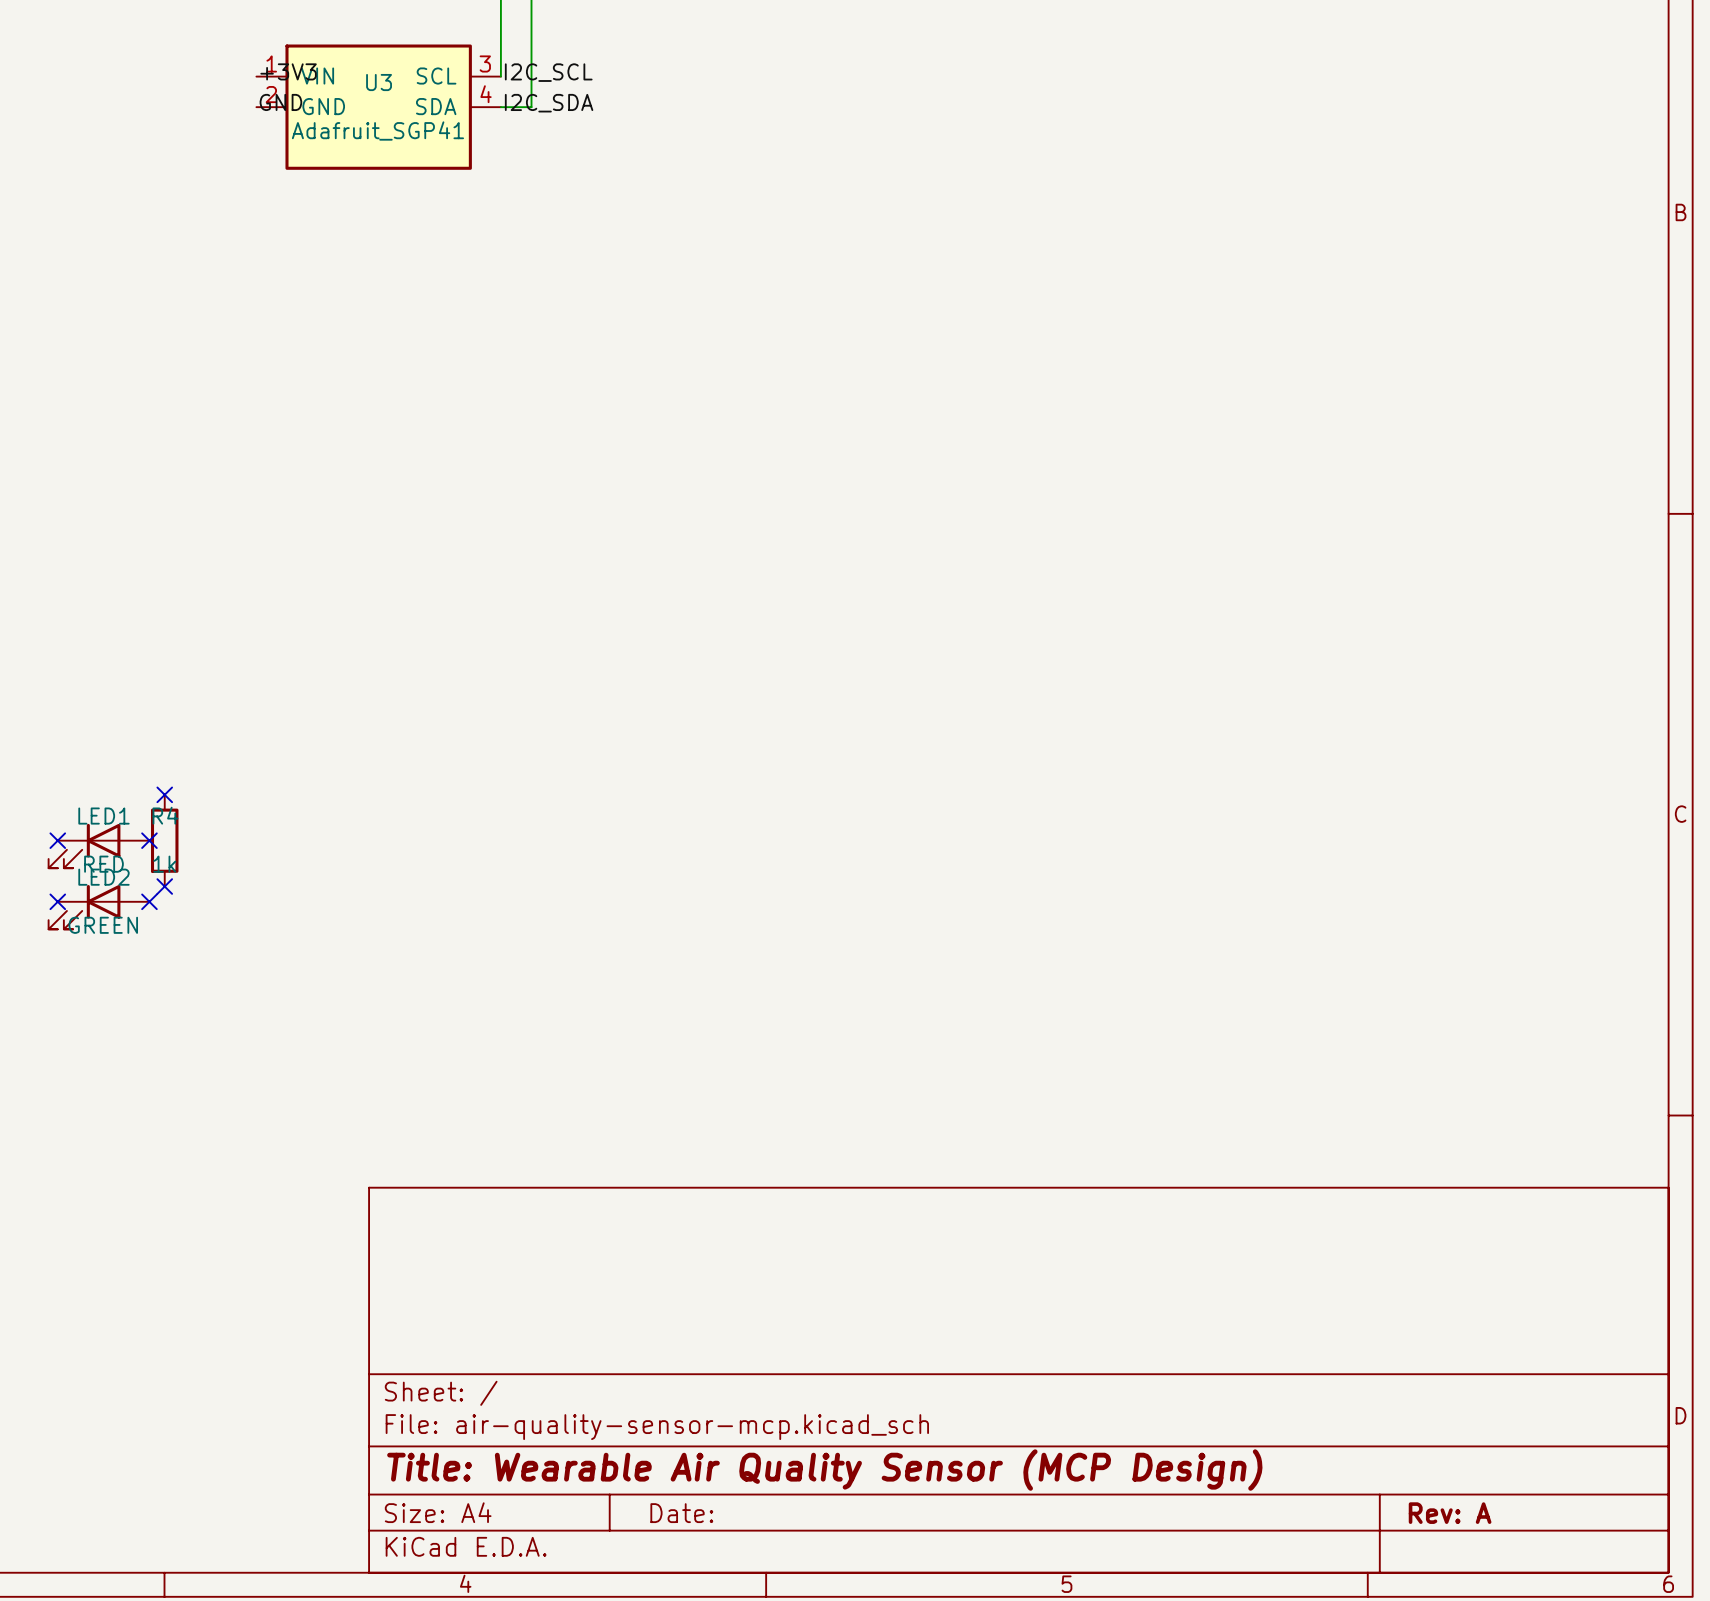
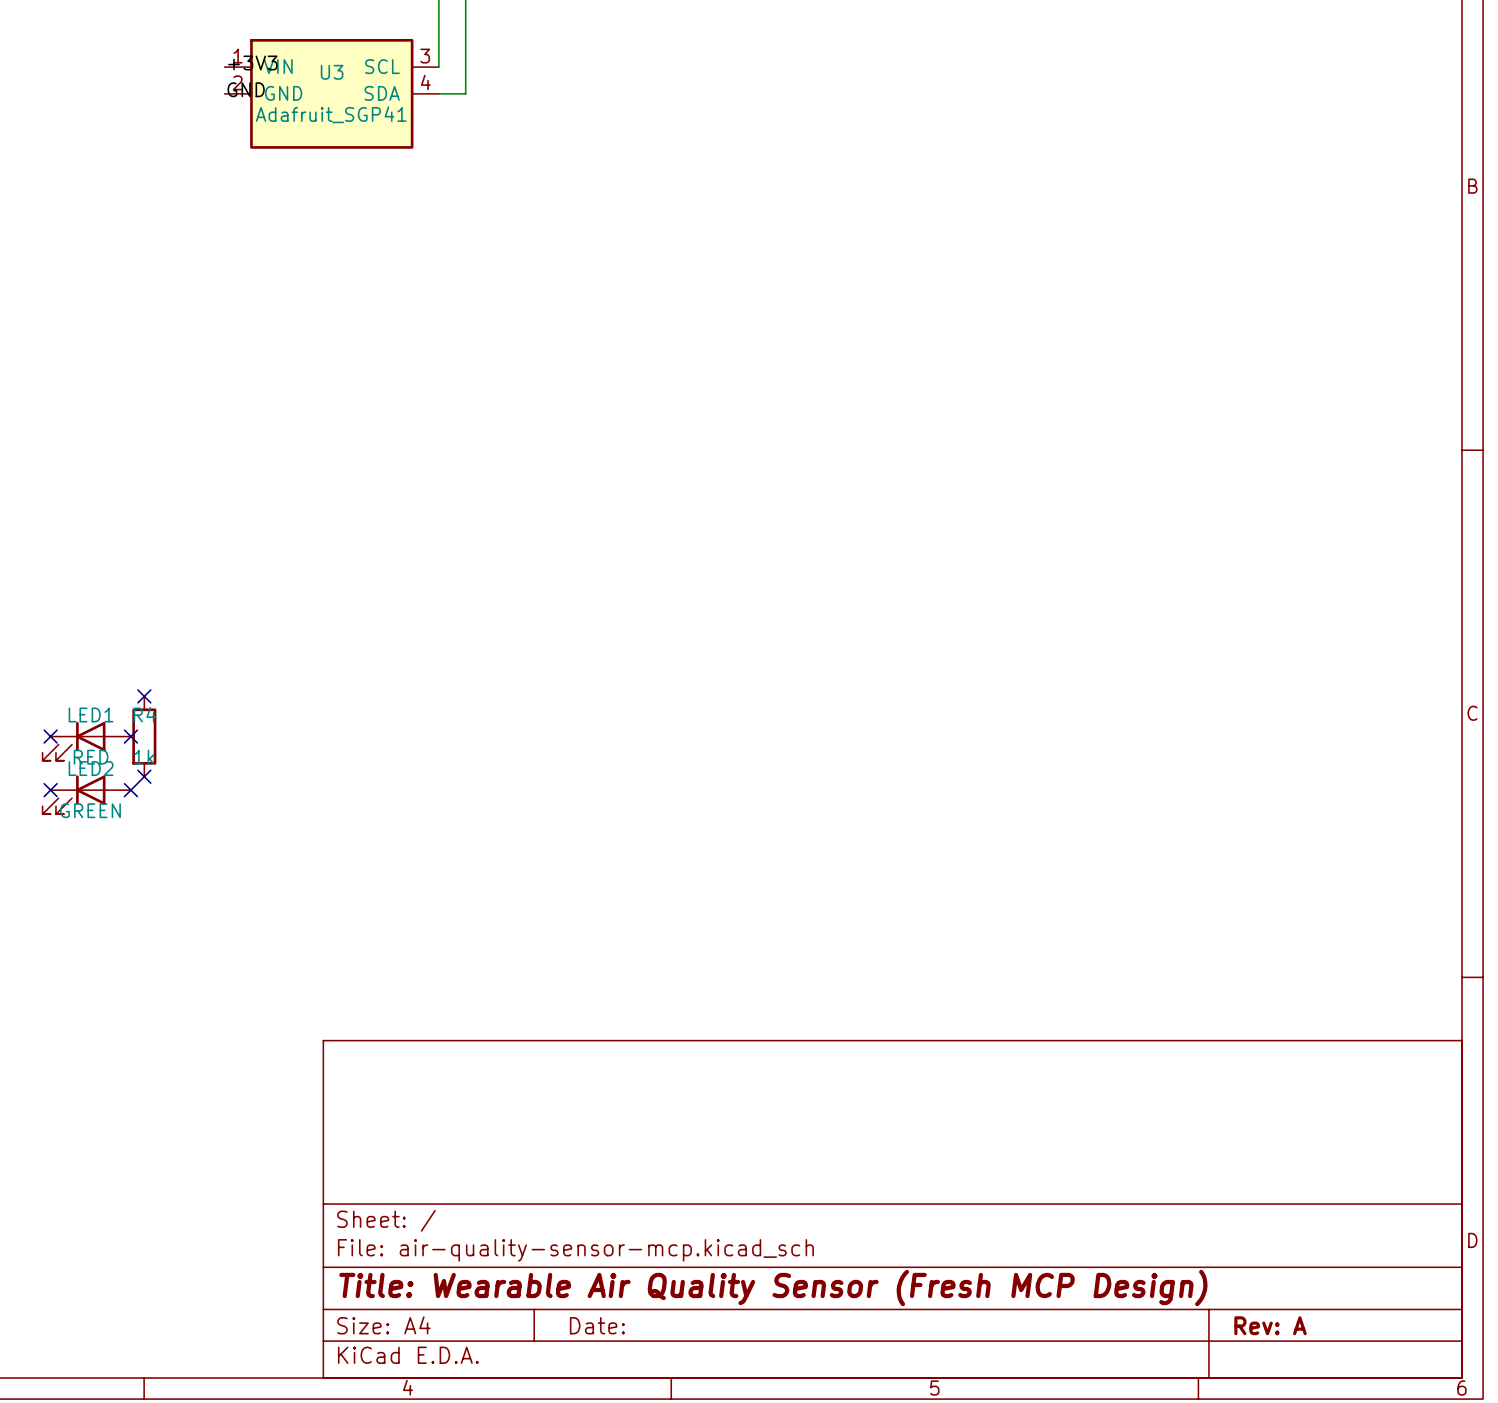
label: I2C_SCL (548, 72) -> none
label: I2C_SDA (549, 103) -> none
title block: Title: Wearable Air Quality Sensor (MCP Design) (824, 1470) -> Title: Wearable Air Quality Sensor (Fresh MCP Design) (773, 1288)

